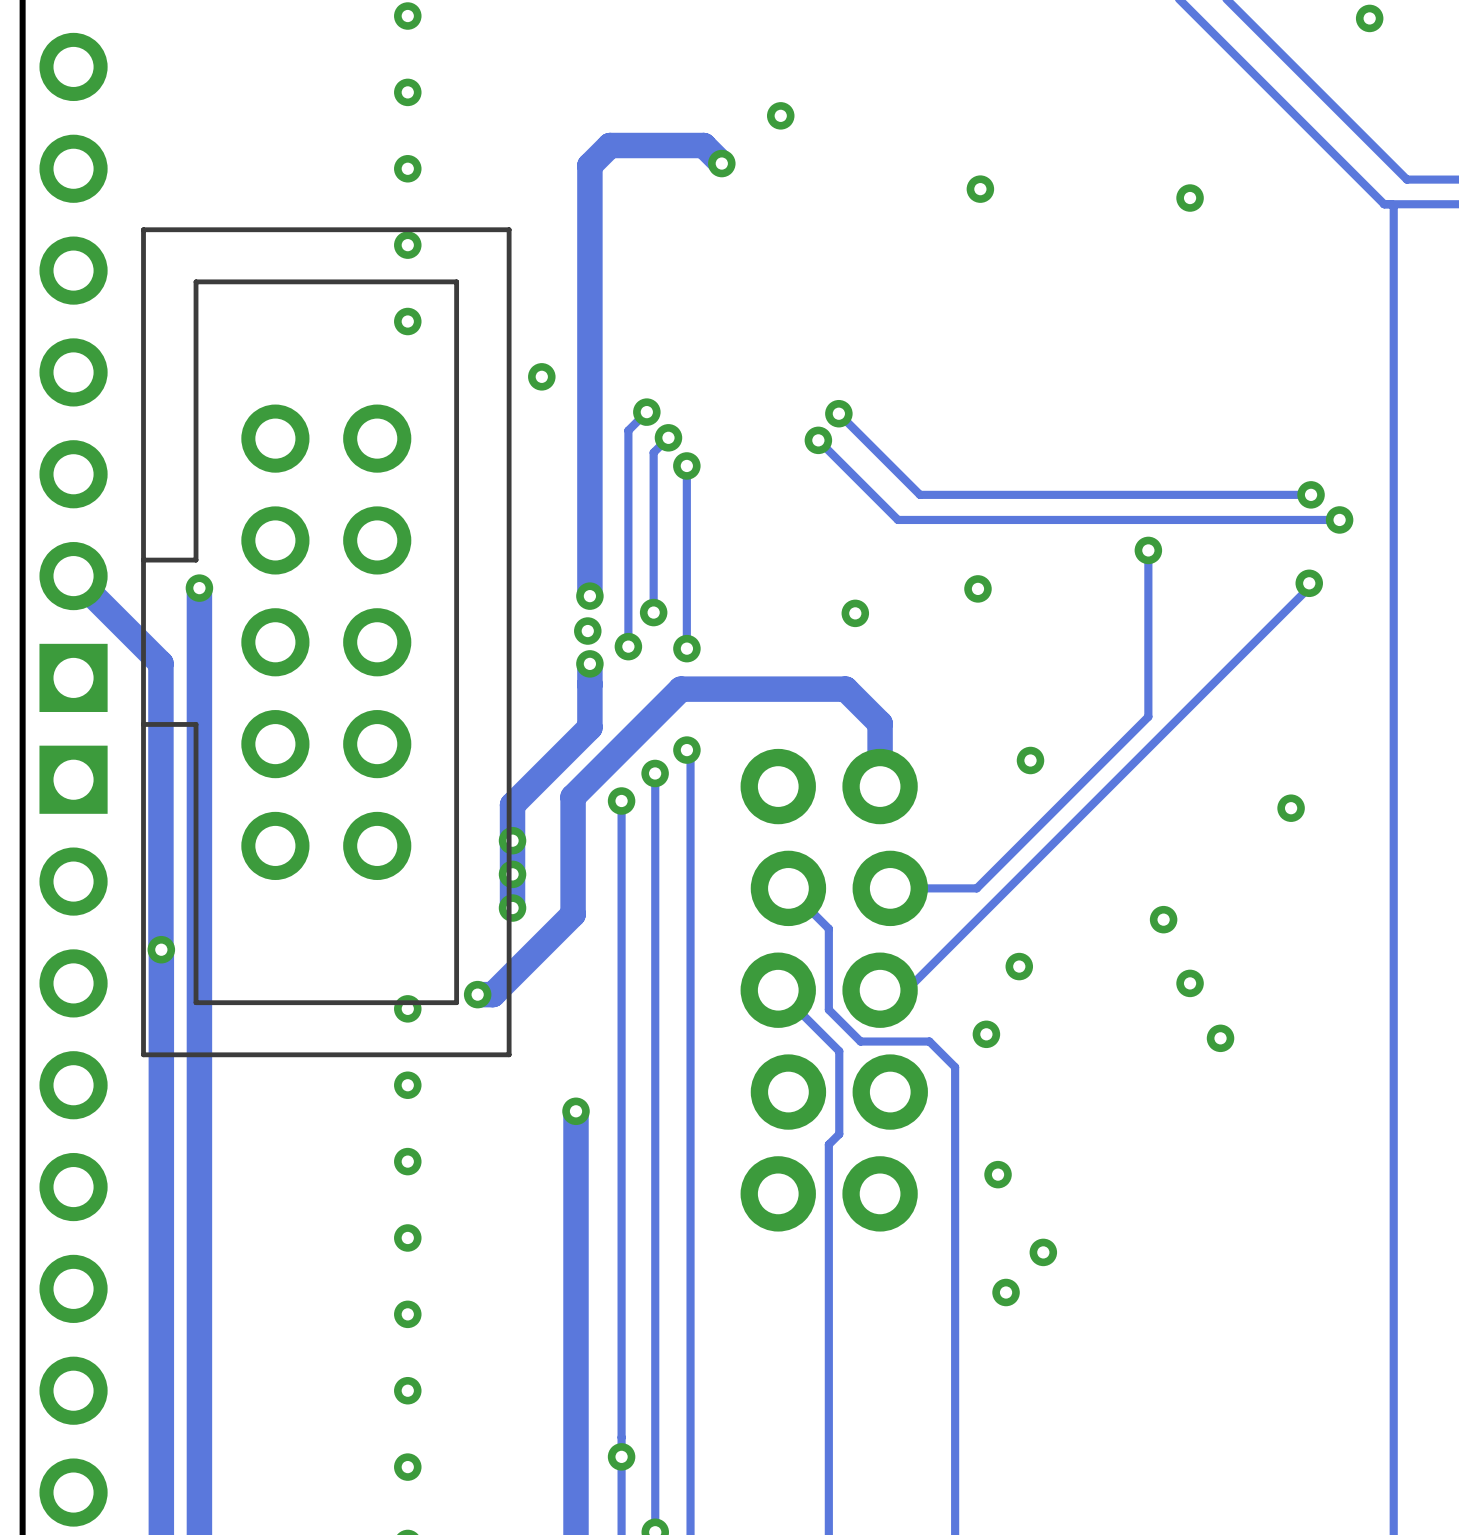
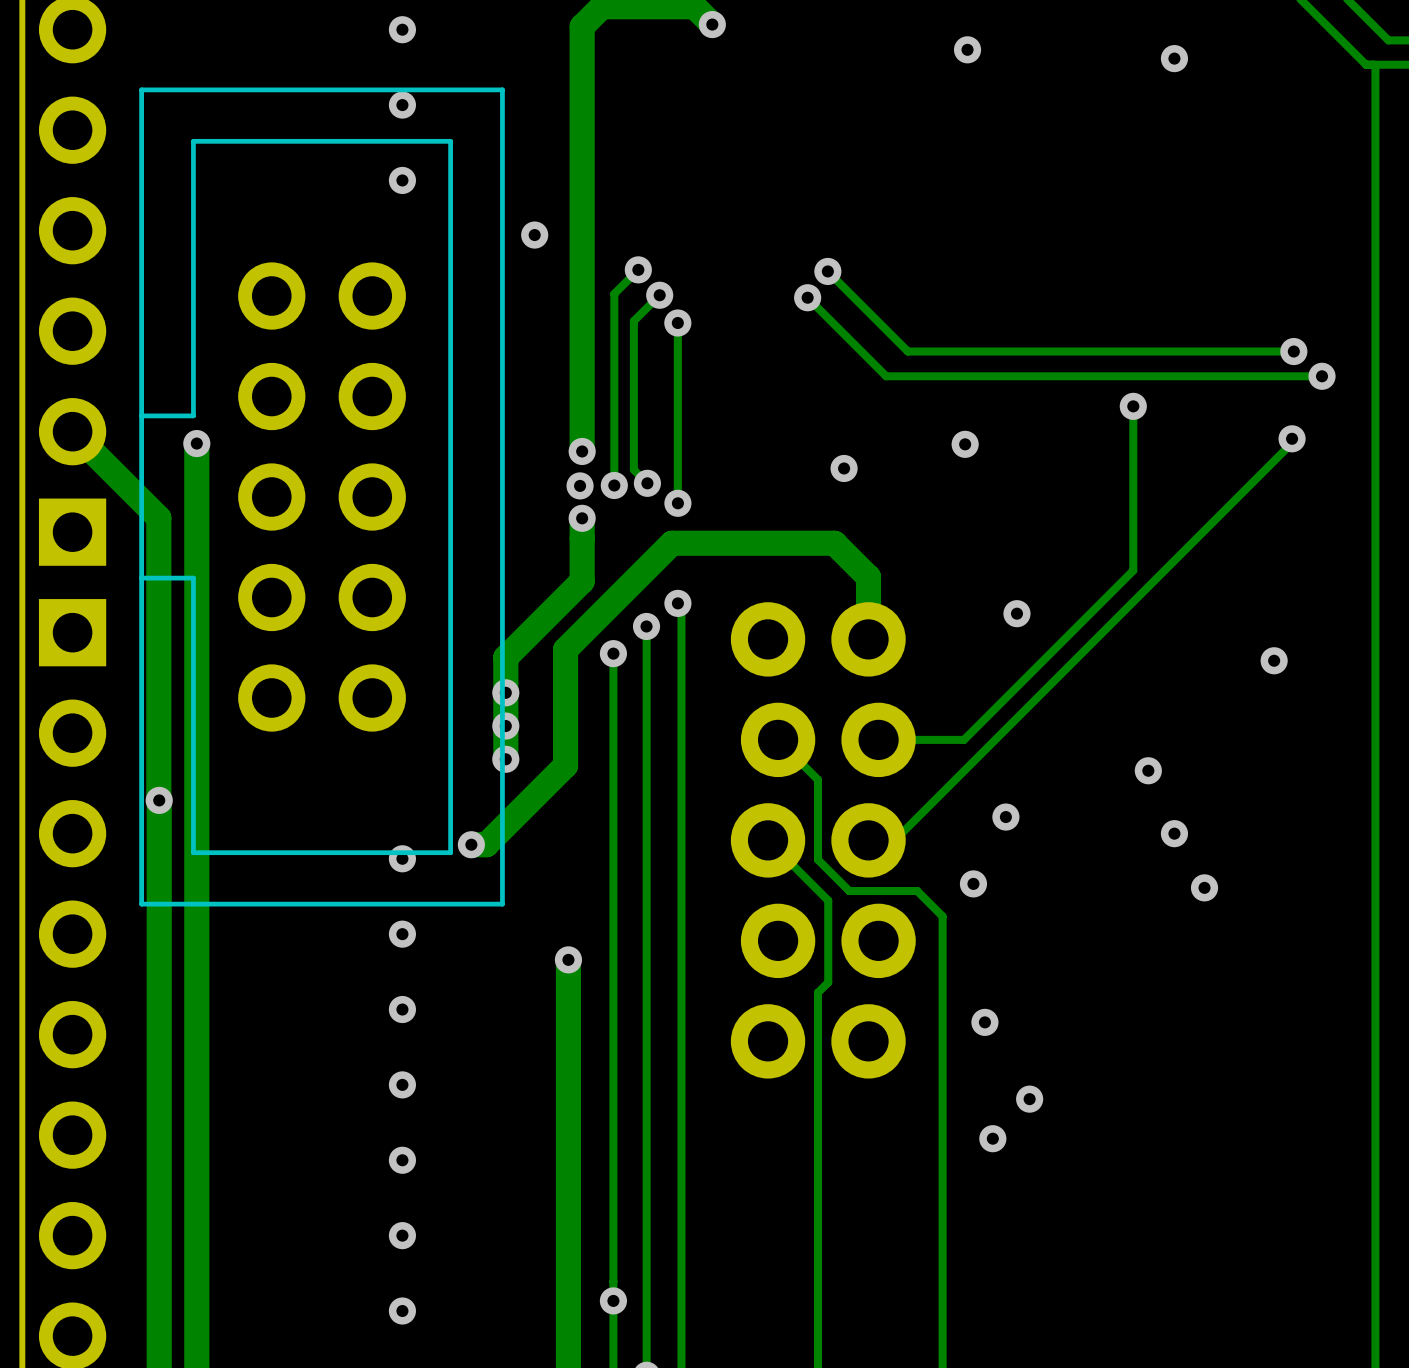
track: (628, 430) (628, 646) -> (620, 288) (614, 293) (614, 485)
track: (653, 452) (653, 612) -> (645, 309) (633, 321) (633, 469) (647, 483)
via position: (653, 612) -> (647, 483)
via position: (628, 646) -> (614, 485)

